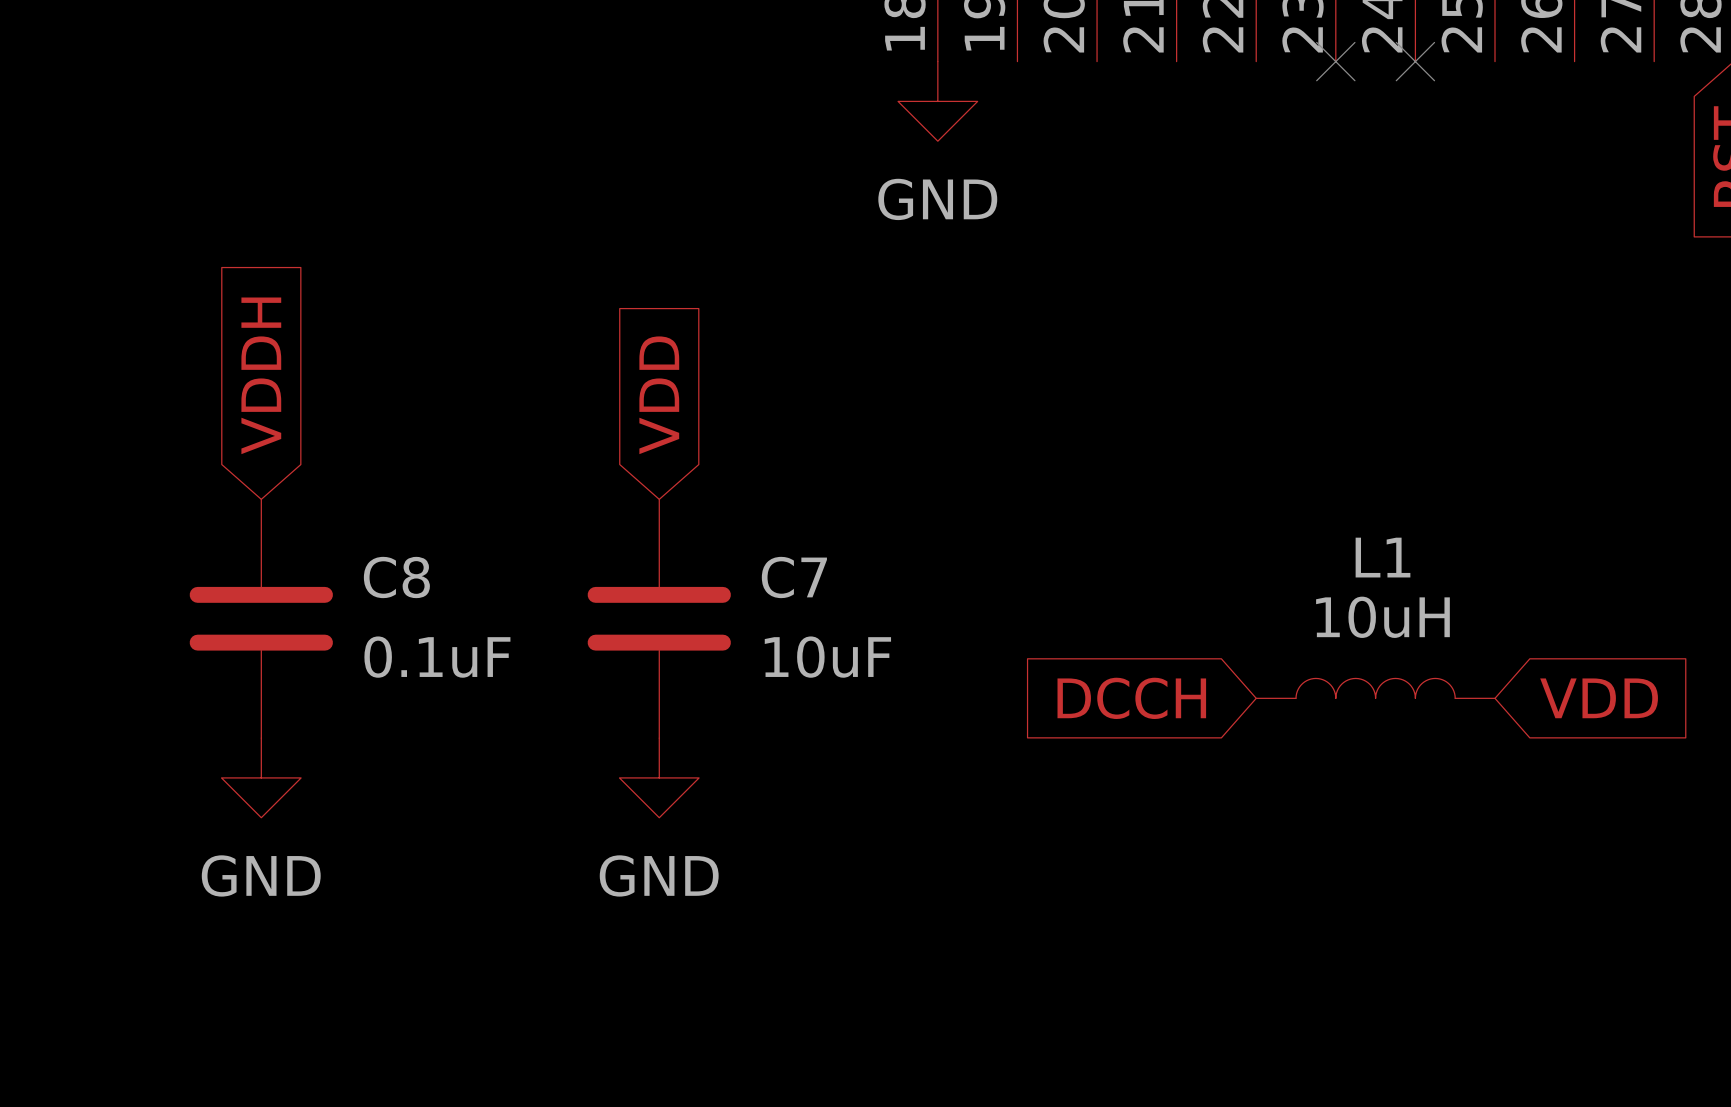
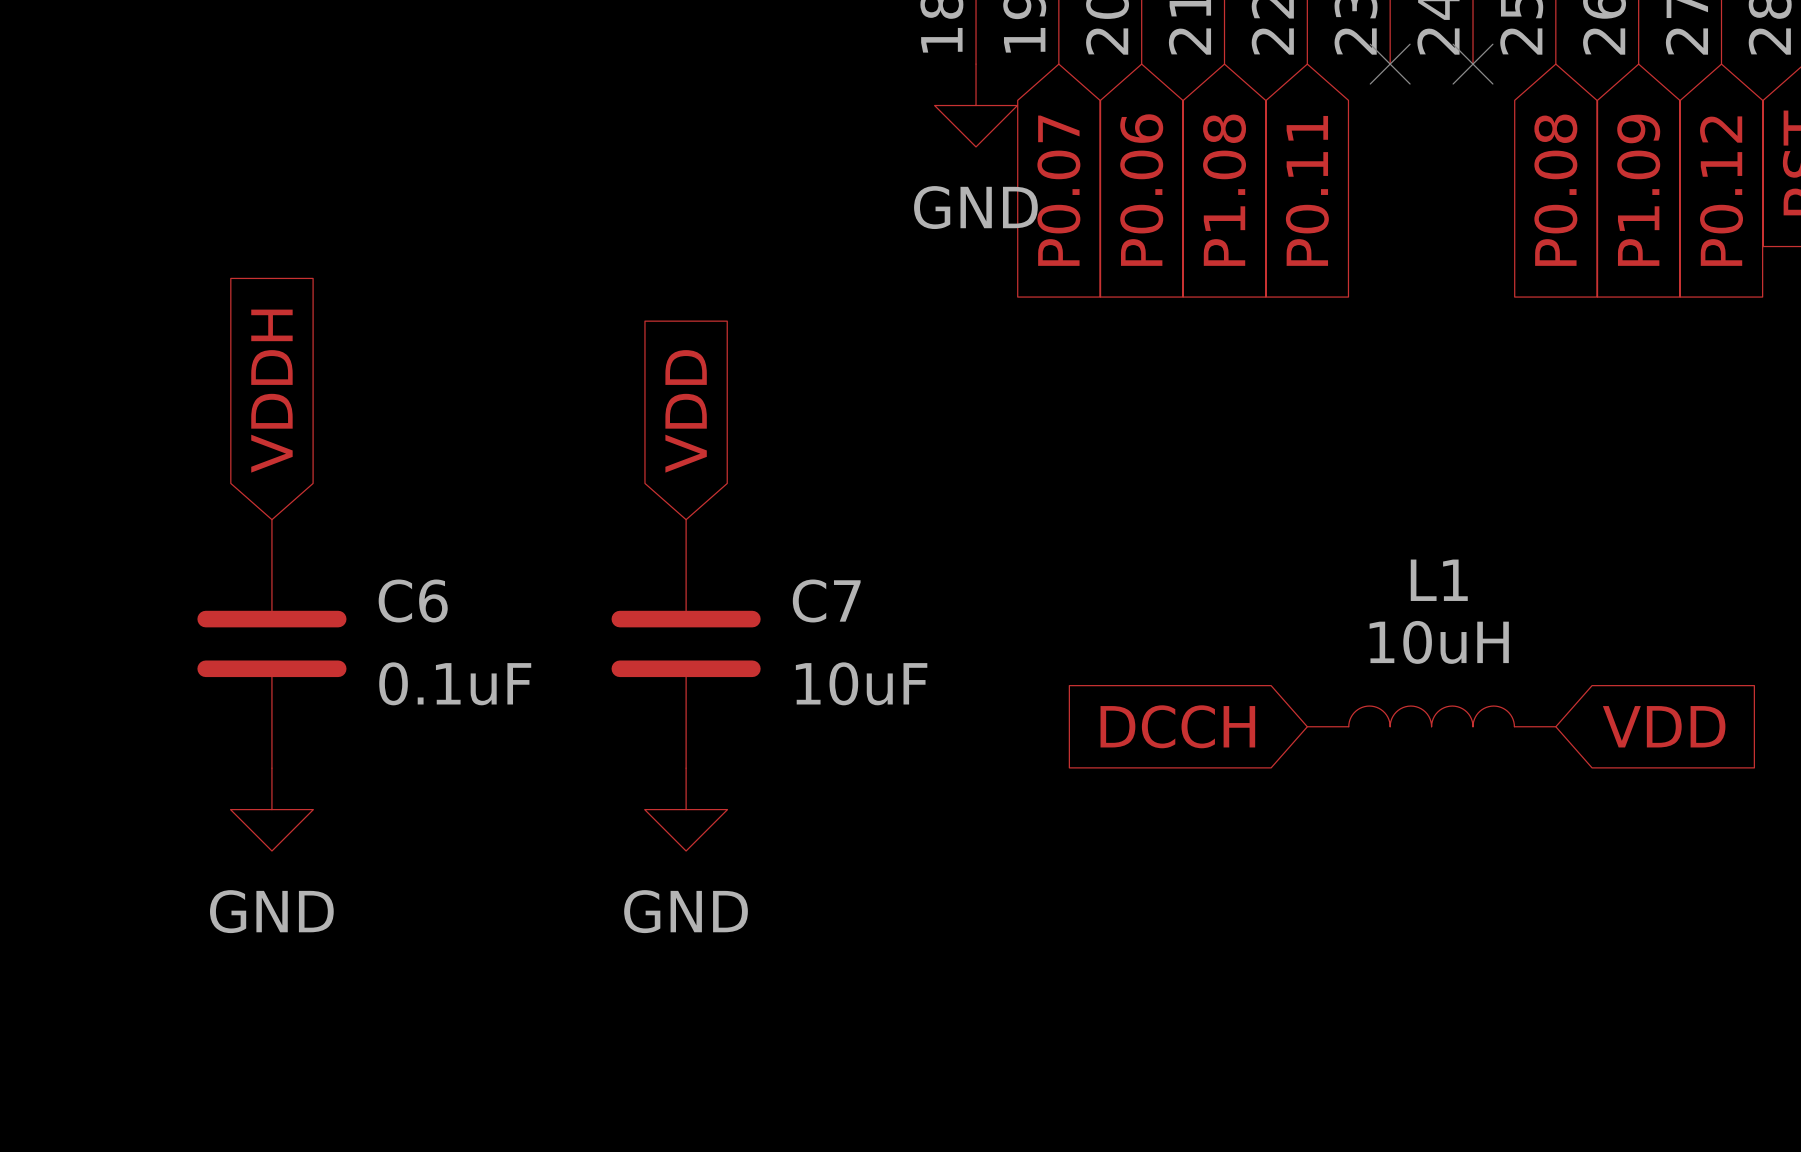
global label: none -> P0.06 (1141, 190)
global label: none -> P1.08 (1224, 190)
global label: none -> P0.08 (1555, 190)
global label: none -> P1.09 (1638, 190)
global label: none -> P0.07 (1058, 190)
global label: none -> P0.11 (1307, 190)
global label: none -> P0.12 (1721, 191)
C8 name: C8 (396, 577) -> C6 (413, 600)

